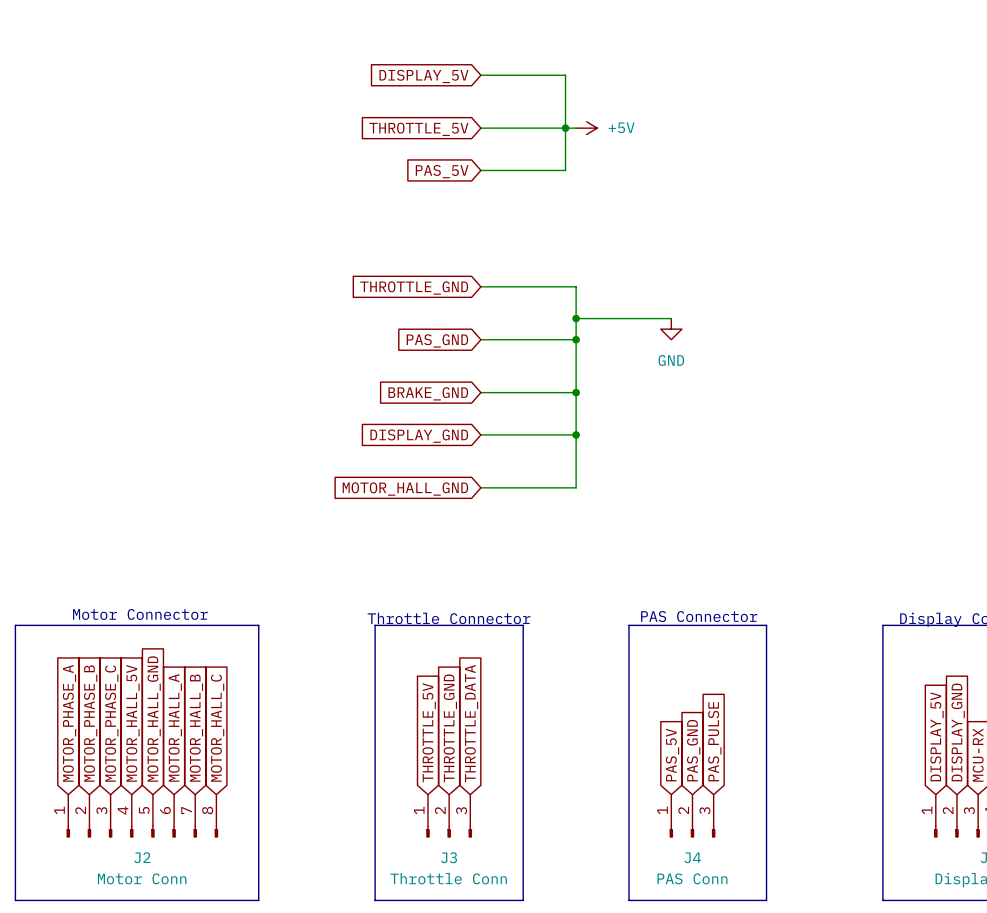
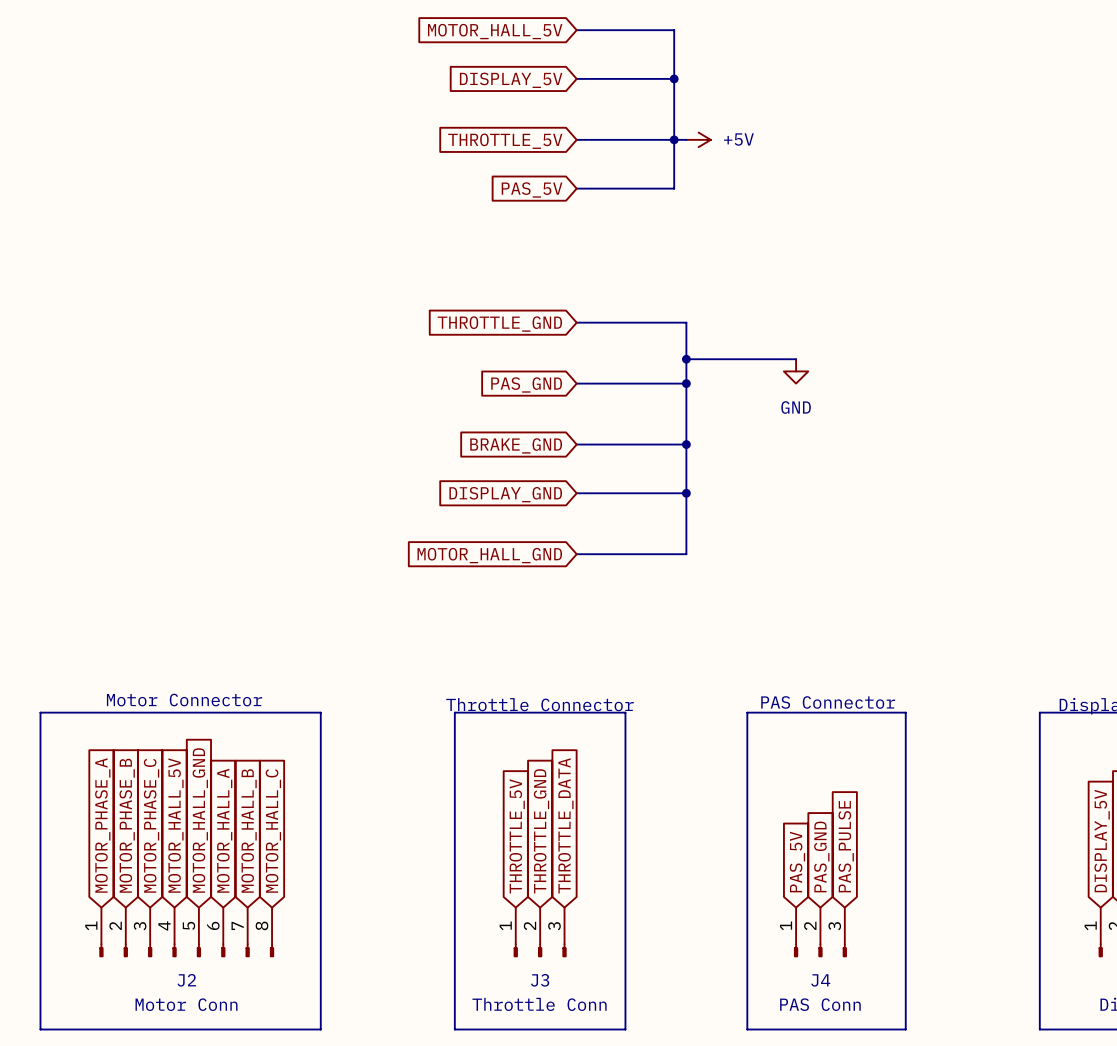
wire: none -> (576, 30) (674, 30) (674, 78)
global label: none -> MOTOR_HALL_5V (495, 31)
junction: none -> (674, 78)

